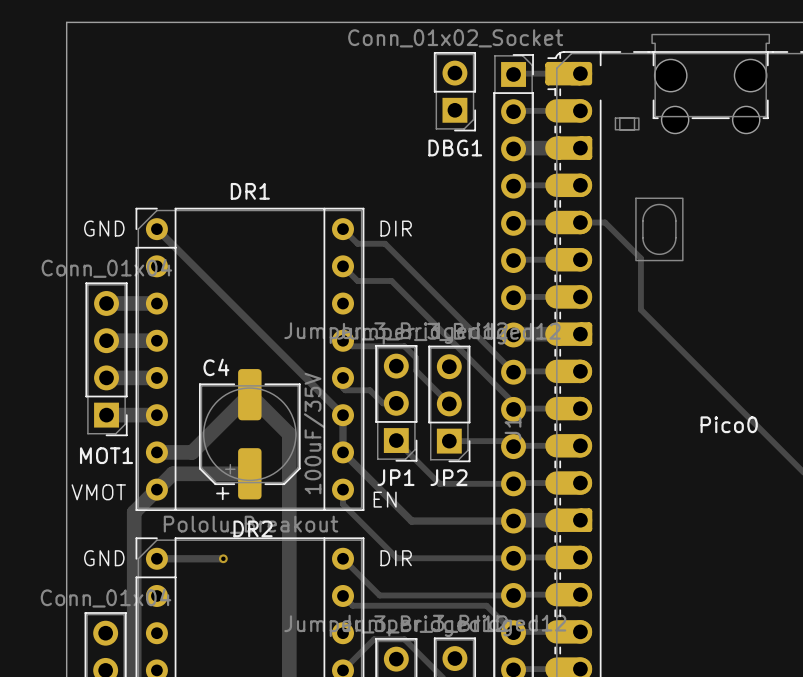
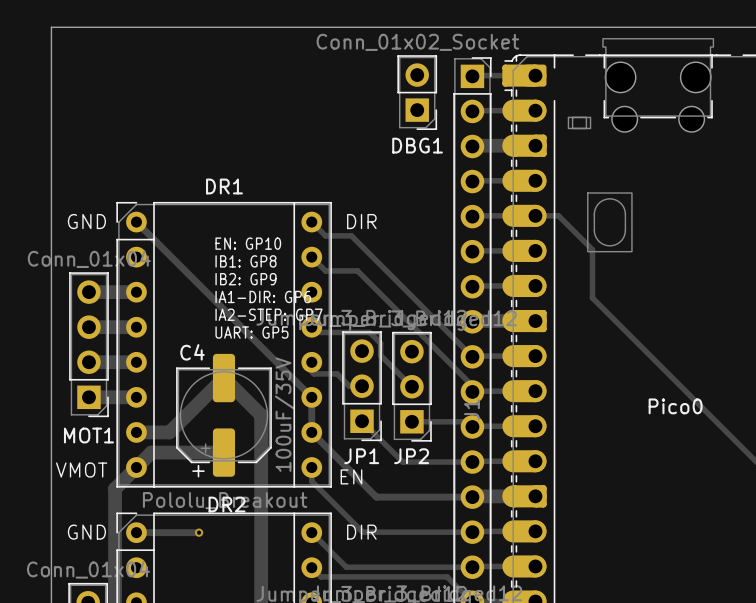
text: none -> EN: GP10 (248, 243)
text: none -> IB1: GP8 (245, 261)
text: none -> IB2: GP9 (245, 279)
text: none -> IA1-DIR: GP6 (263, 296)
text: none -> IA2-STEP: GP7 (268, 314)
text: none -> UART: GP5 (251, 332)

